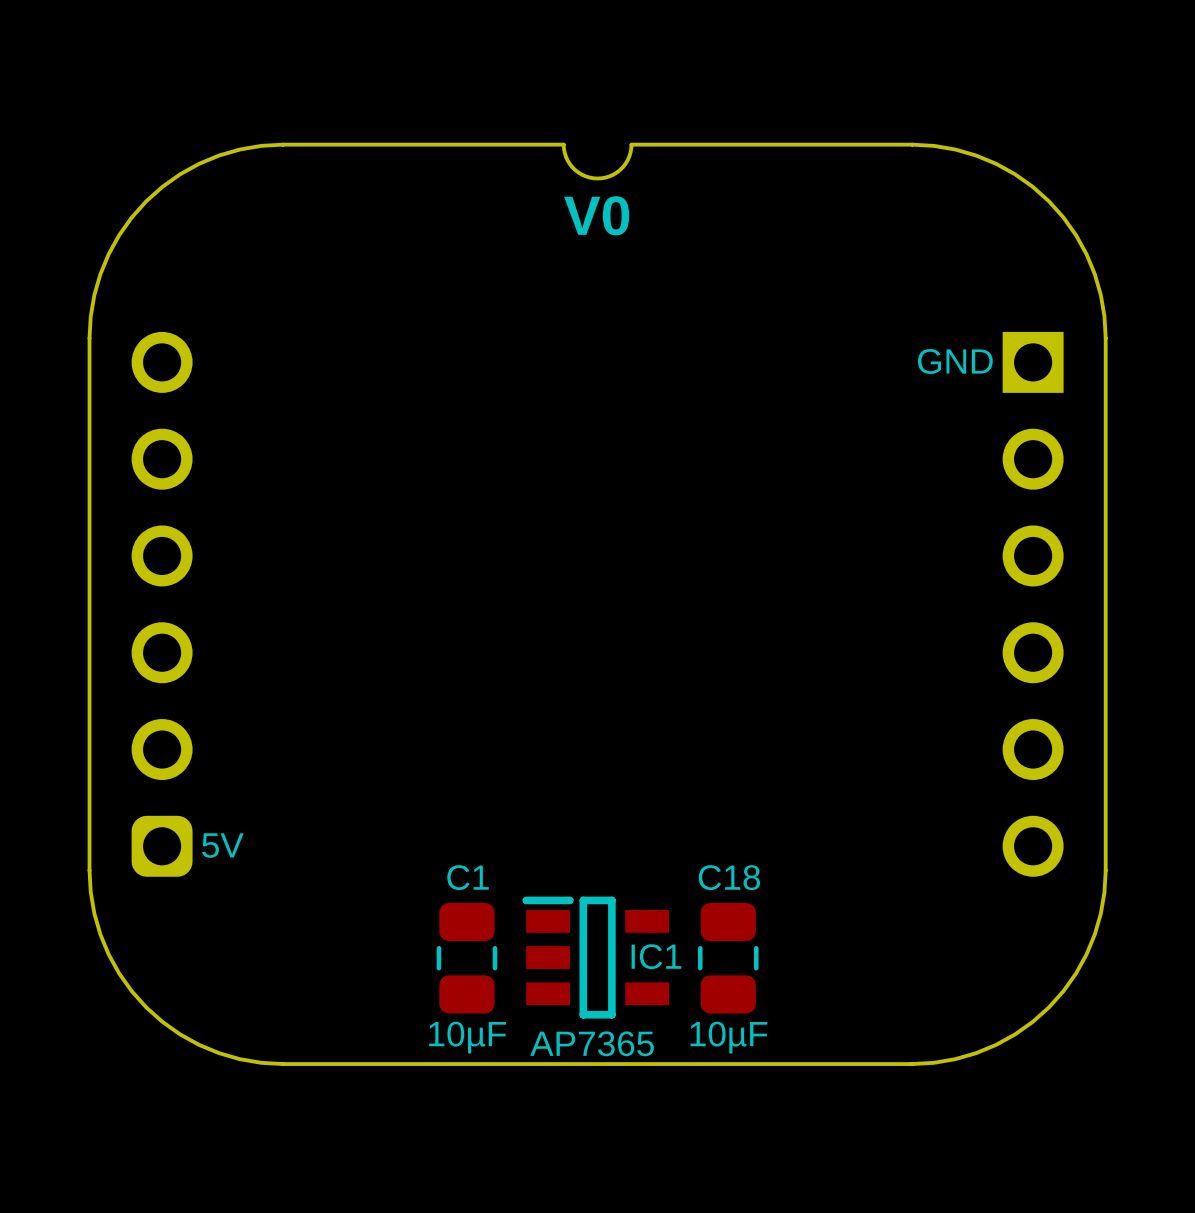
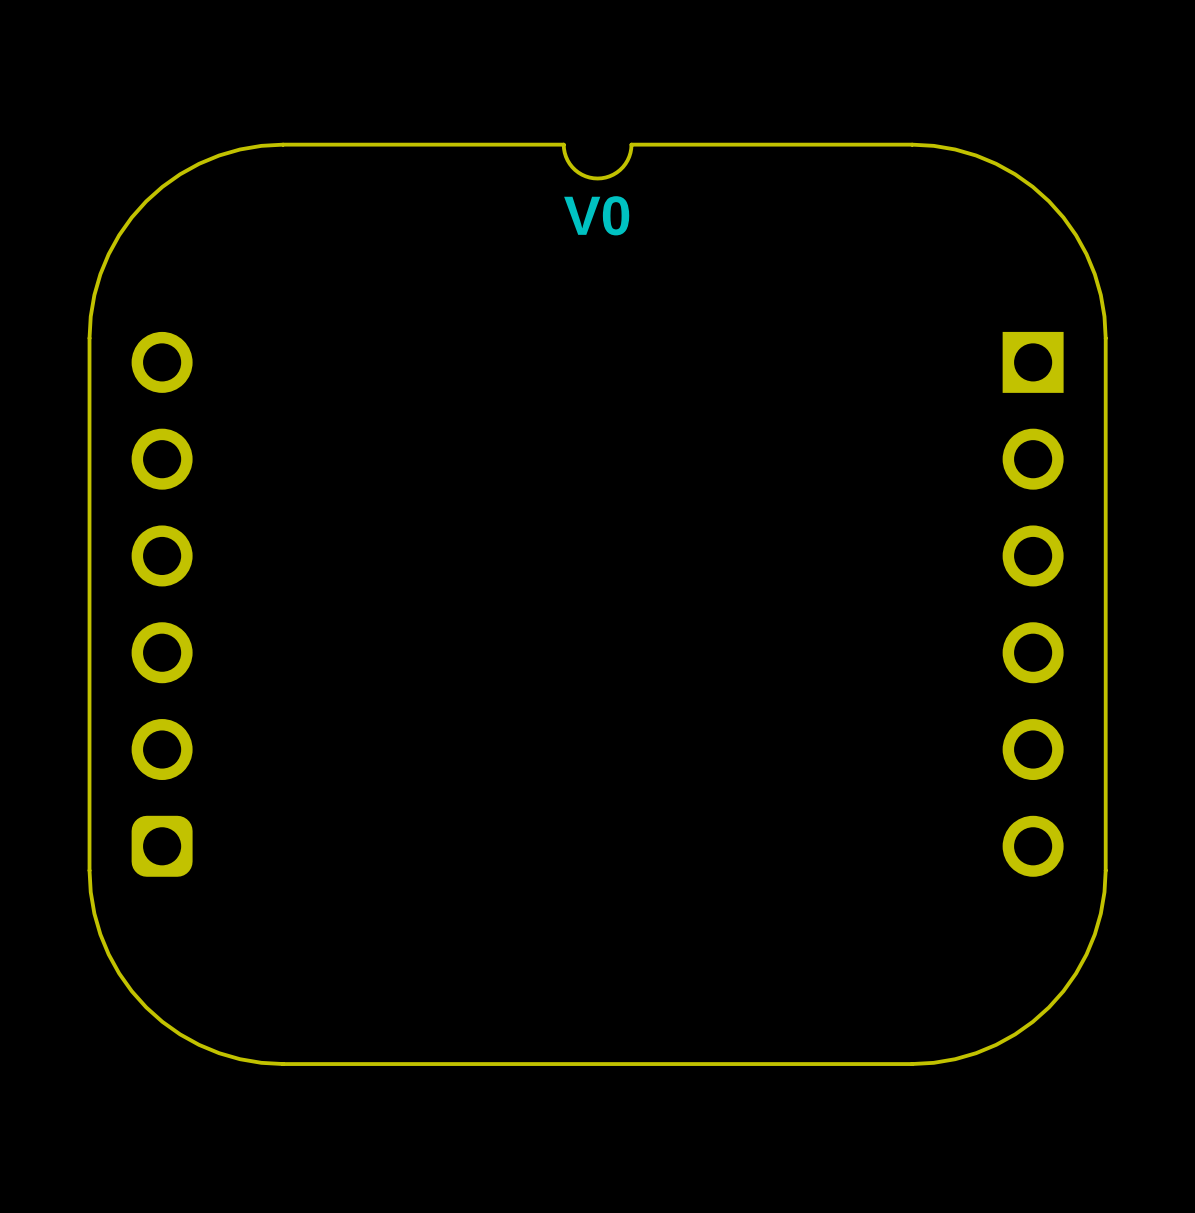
text: GND (955, 361) -> none
text: 5V (222, 845) -> none
IC1: (595, 957) -> none
C1: 10µF (466, 958) -> none
C18: 10µF (728, 958) -> none

